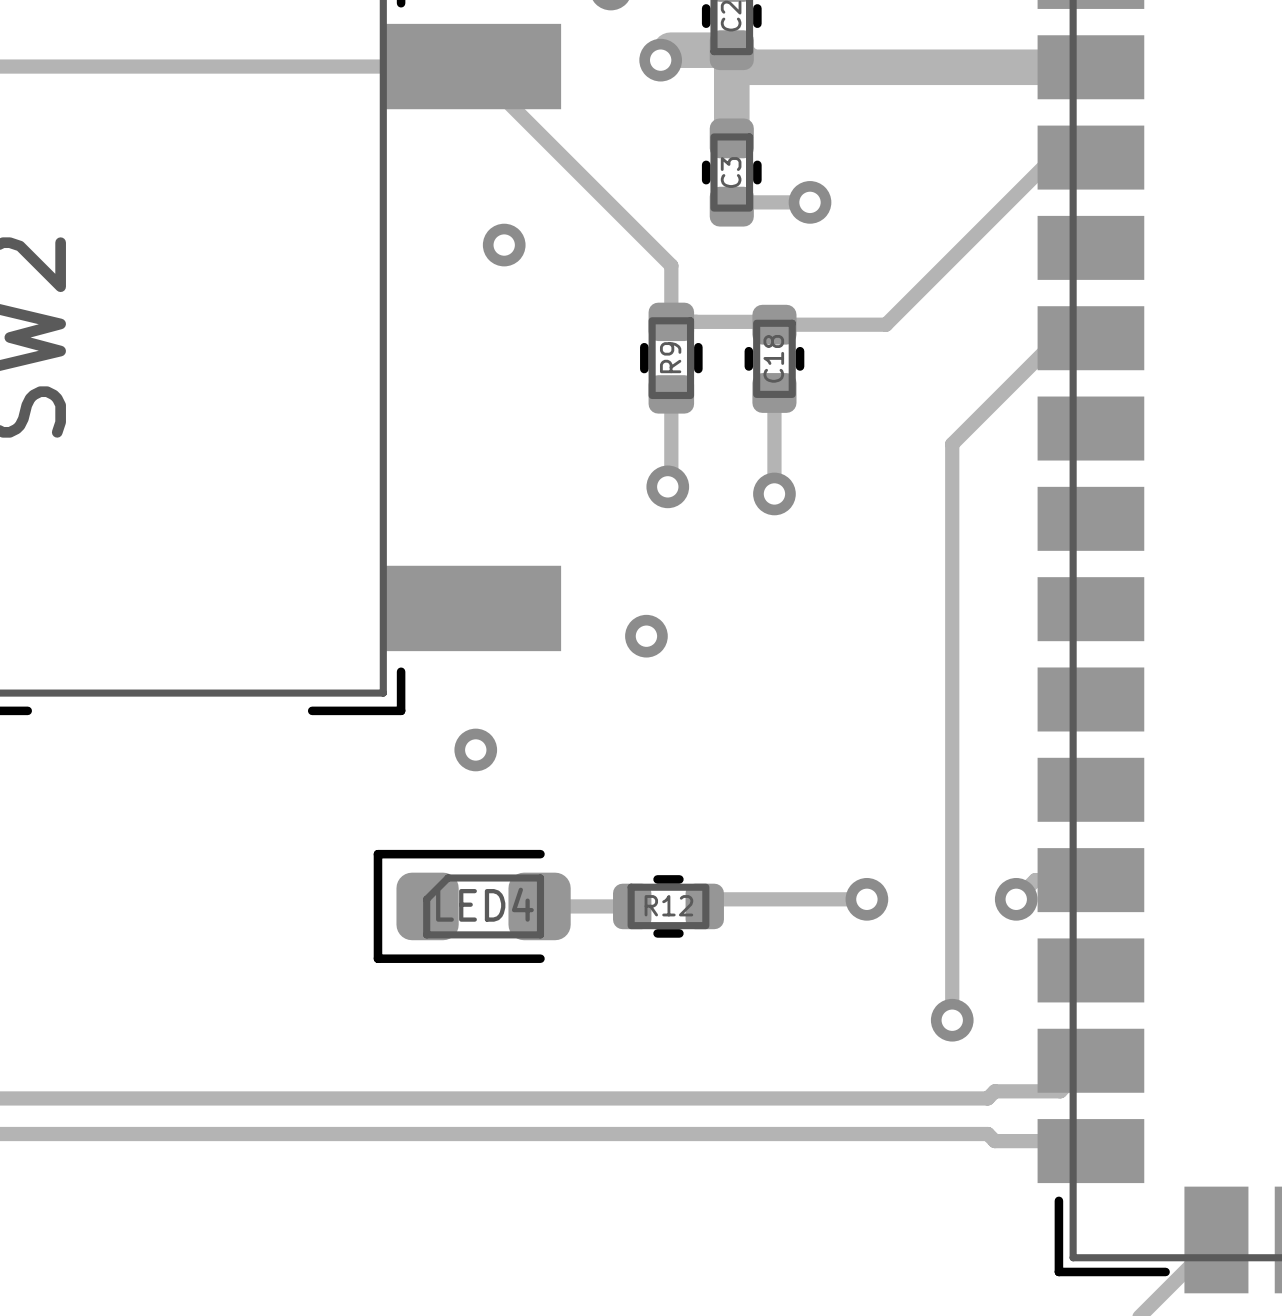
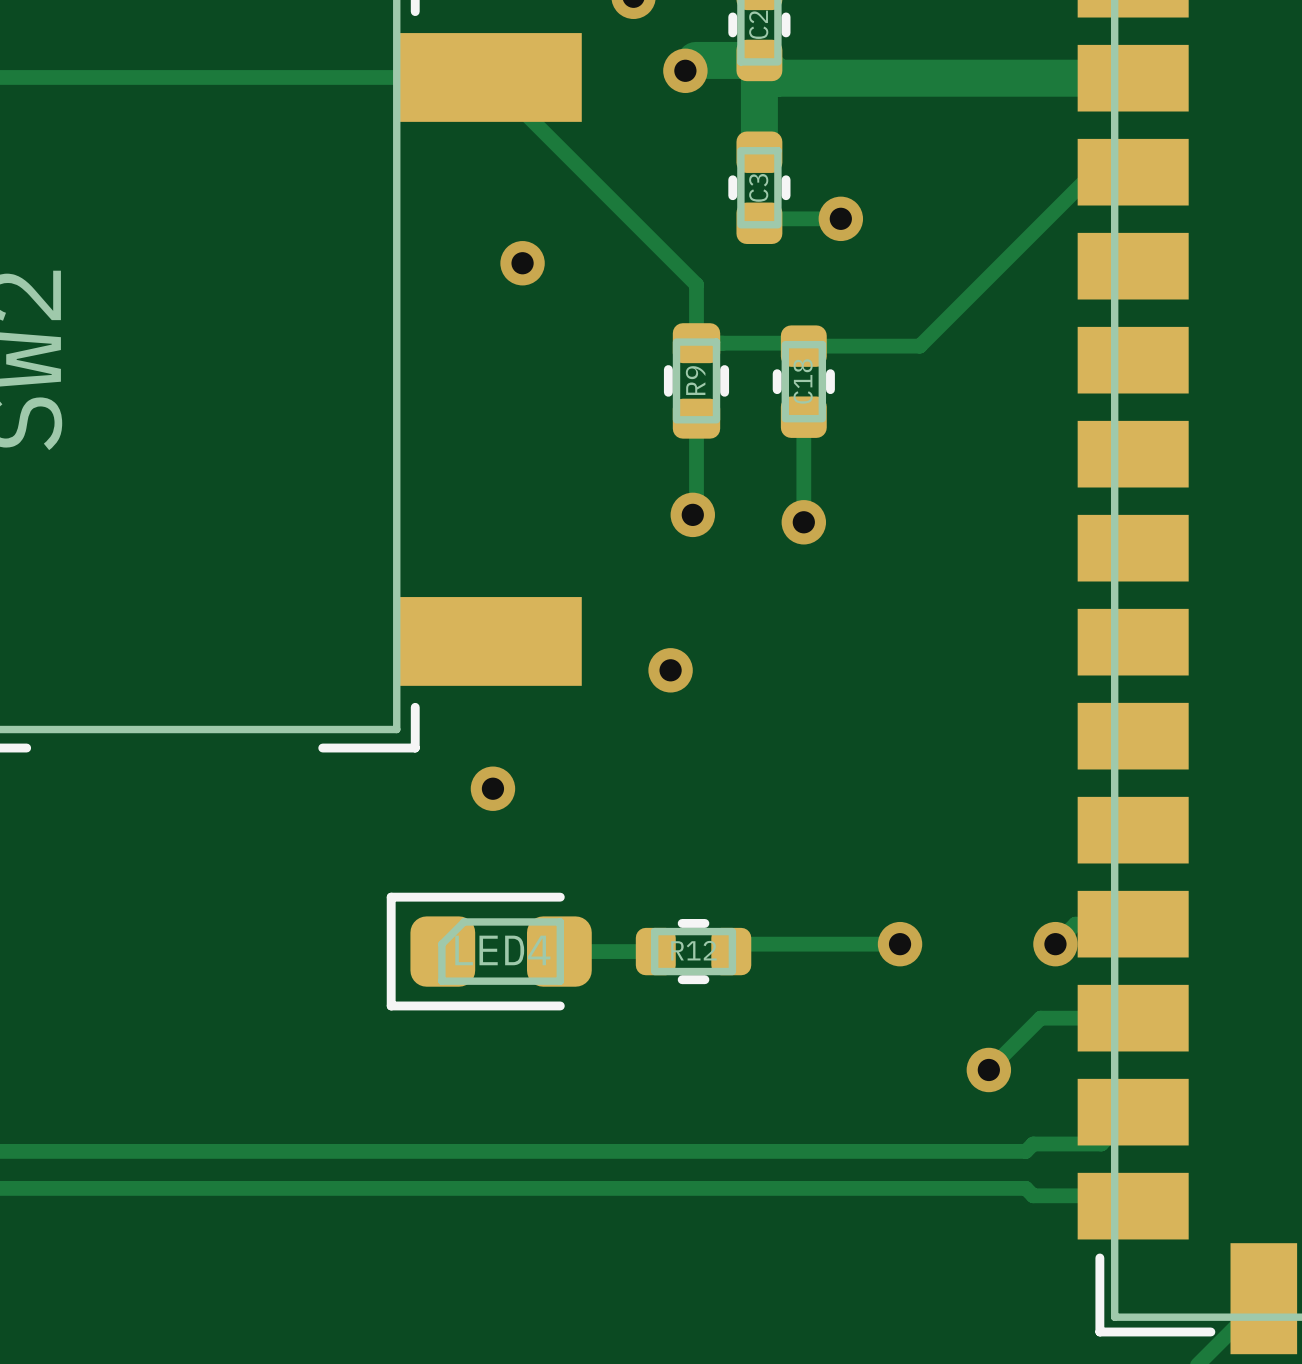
track: (1058, 338) (952, 444) (952, 1020) -> (1133, 1018) (1040, 1018) (988, 1069)

